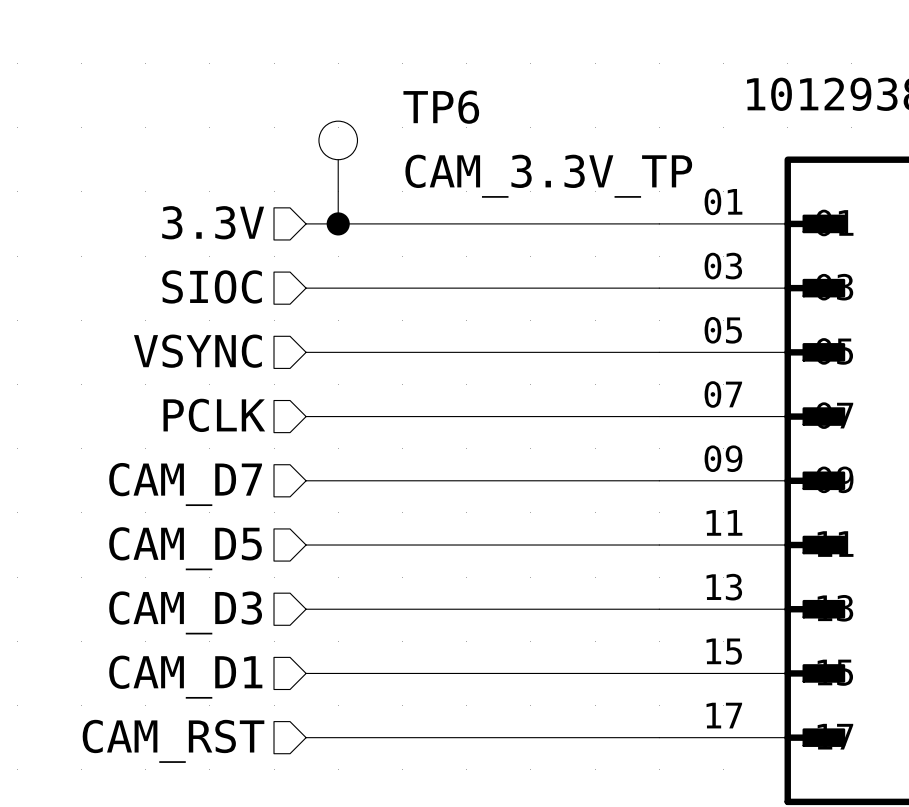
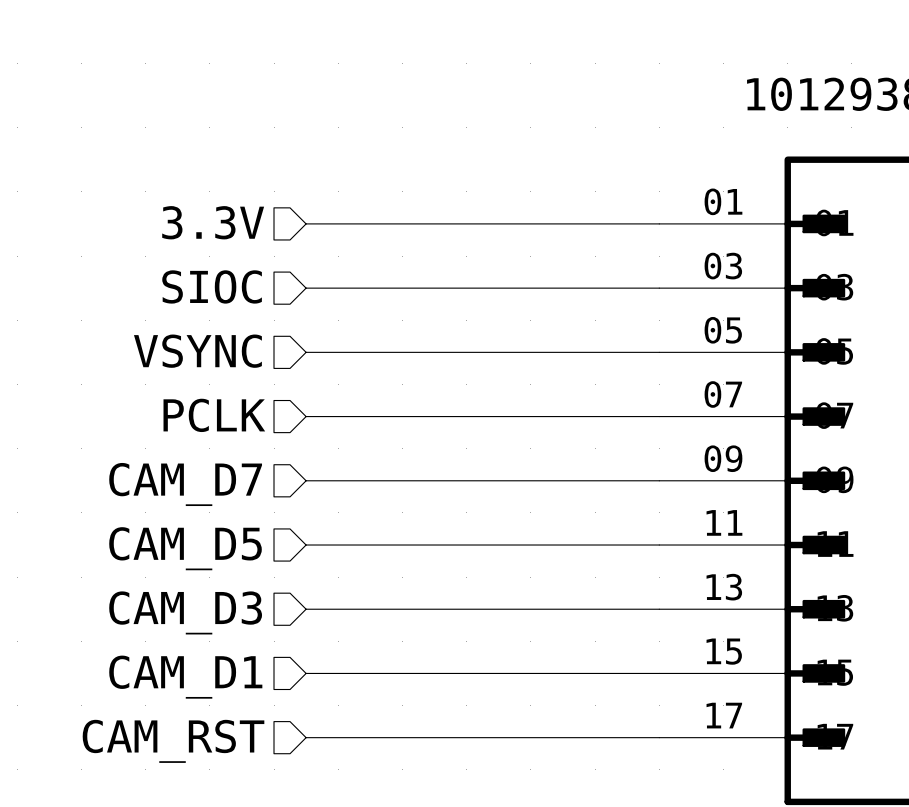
TP6: CAM_3.3V_TP (338, 172) -> none
junction: (338, 223) -> none

